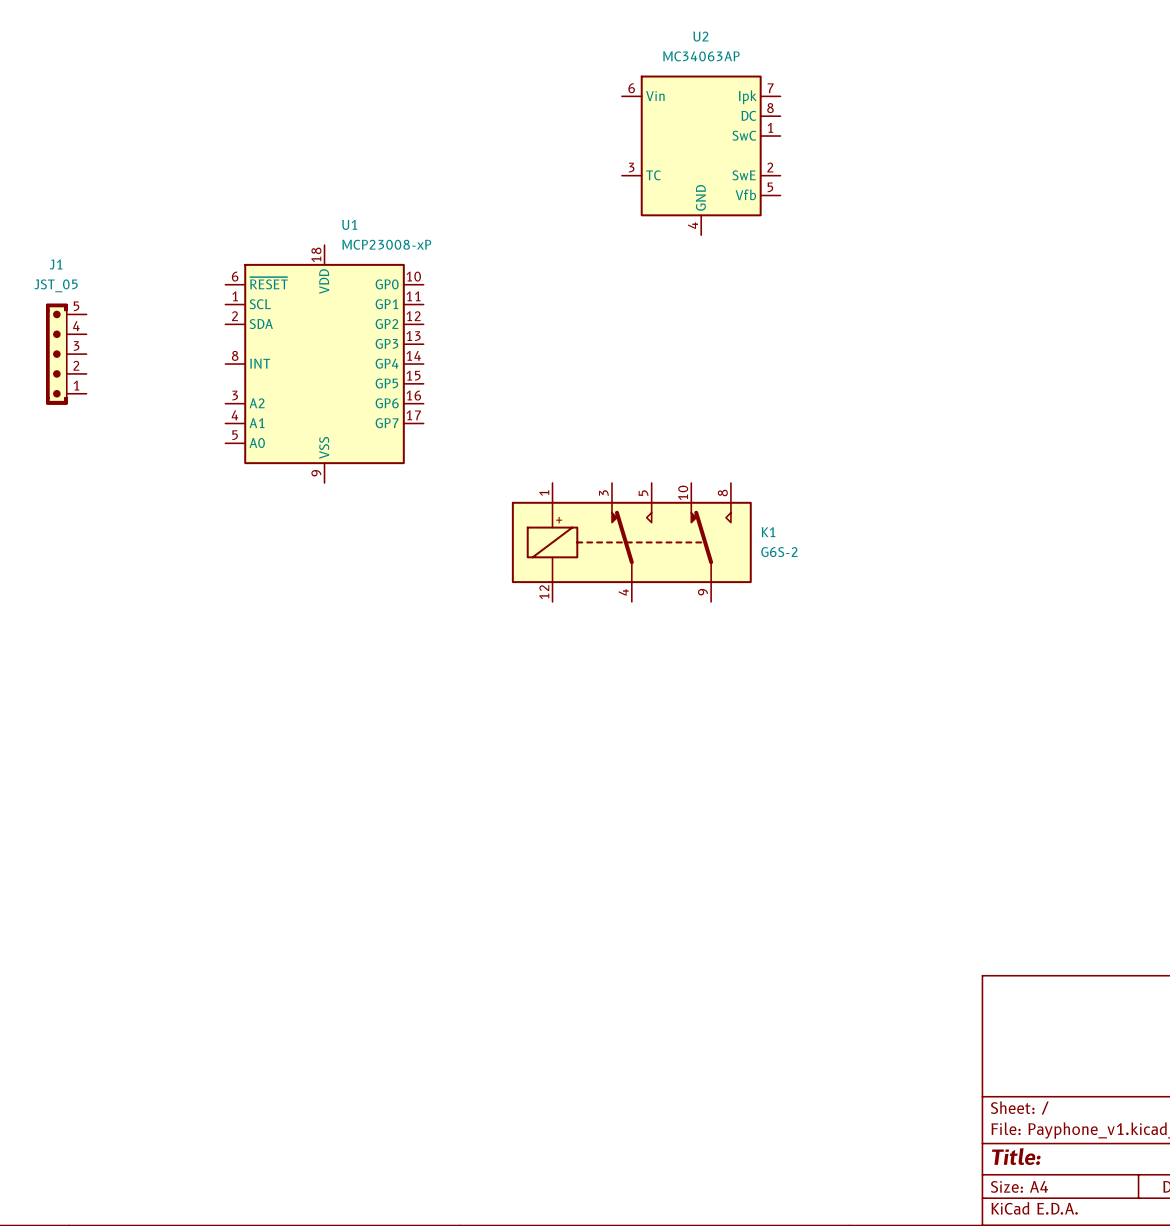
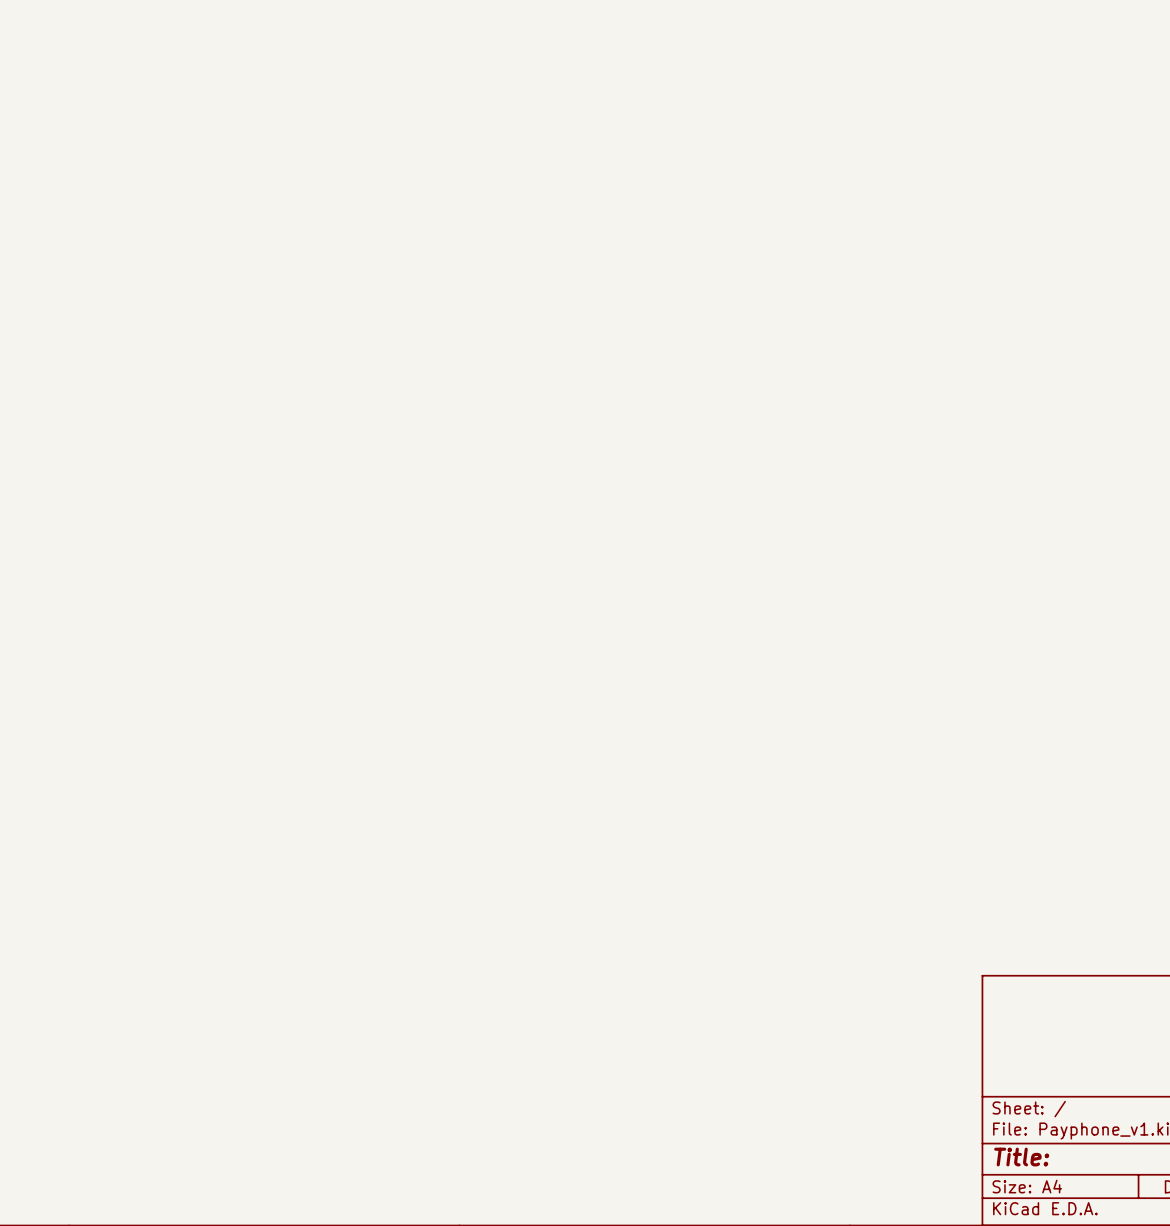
U2: MC34063AP (701, 155) -> none
J1: JST_05 (66, 354) -> none
U1: MCP23008-xP (324, 364) -> none
K1: G6S-2 (631, 542) -> none

